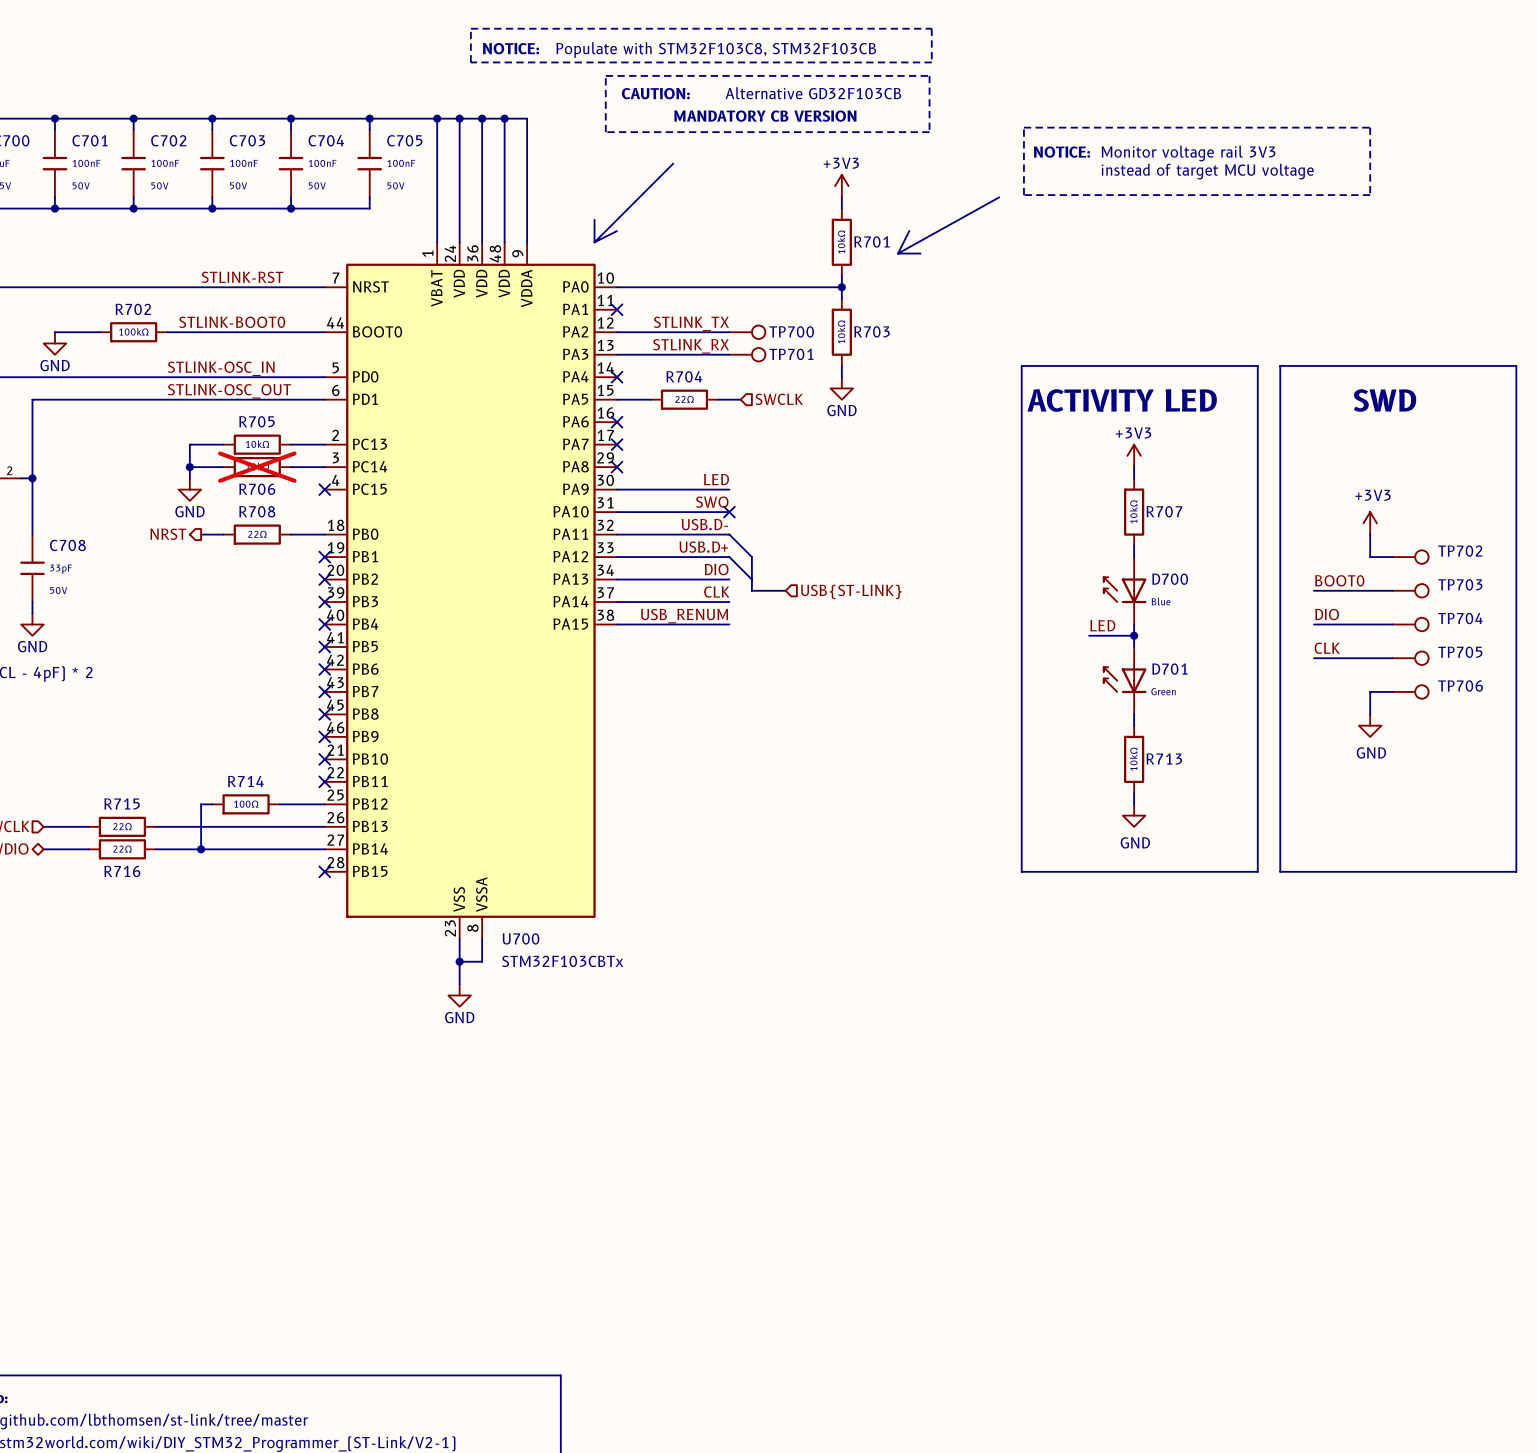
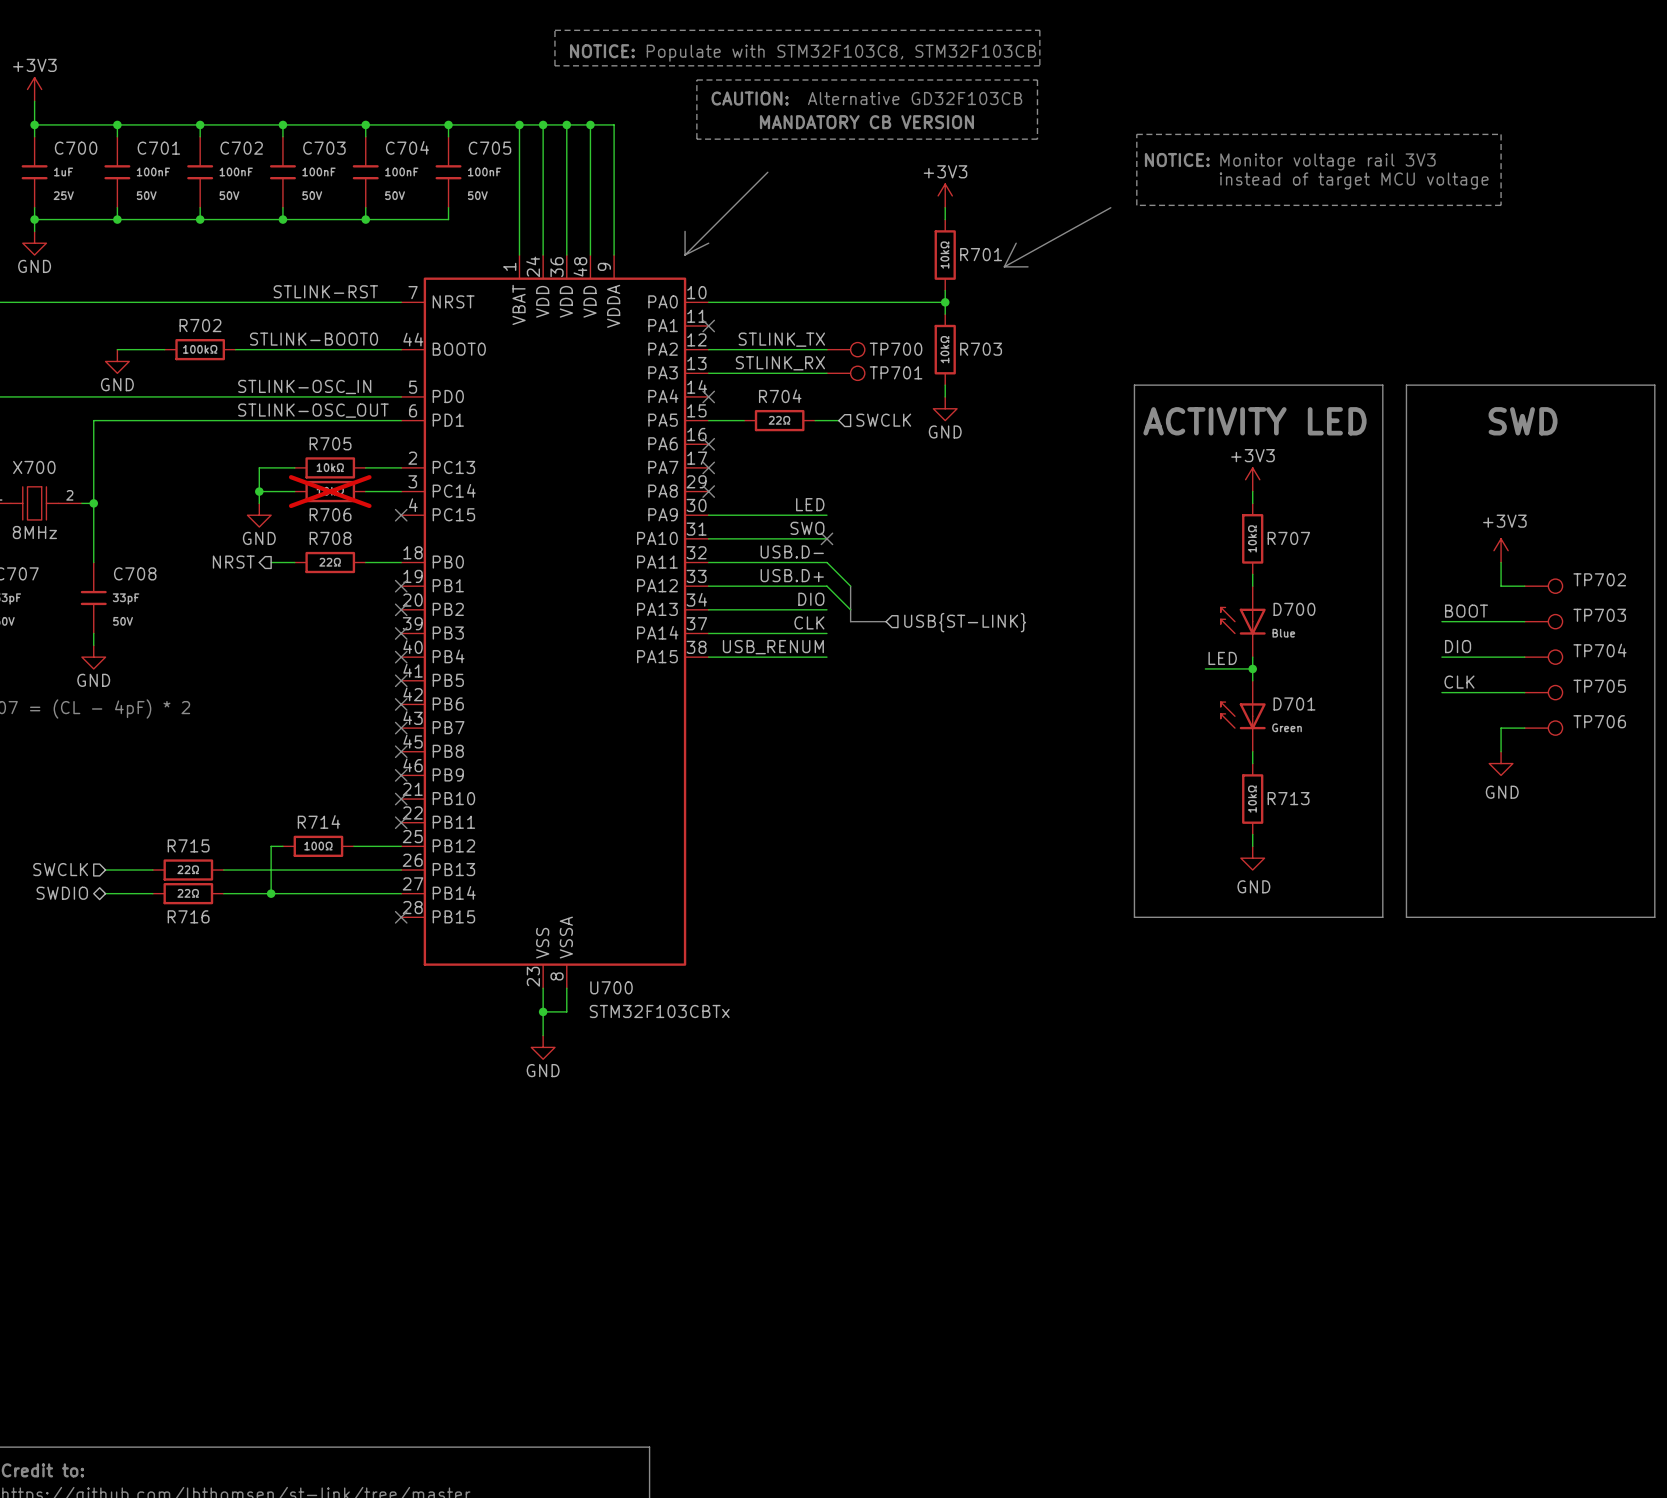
label: BOOT0 (1339, 580) -> BOOT (1466, 611)

